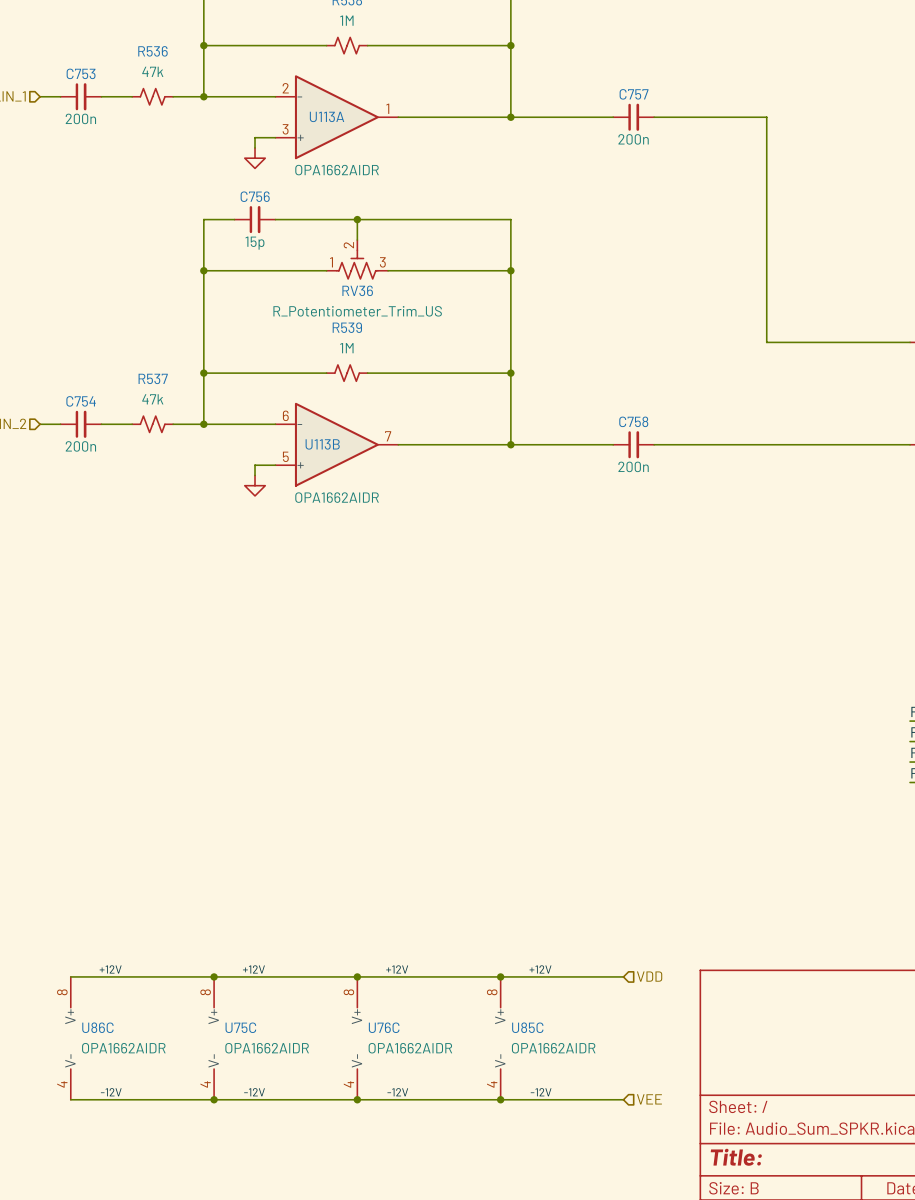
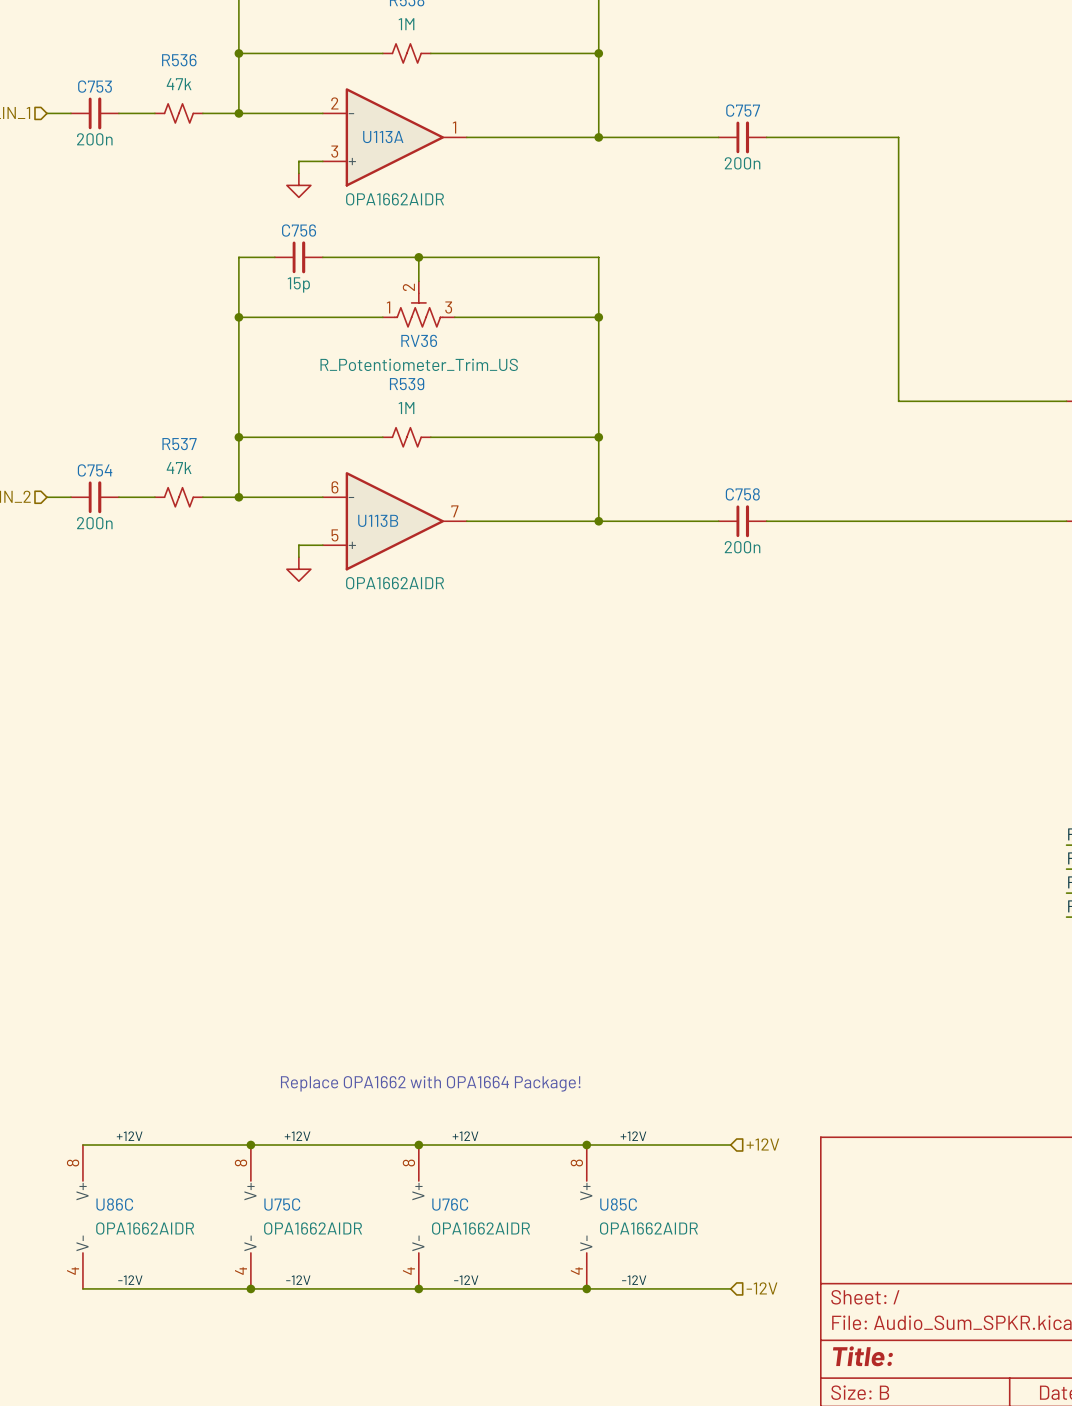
text: none -> Replace OPA1662 with OPA1664 Package! (430, 1083)
hierarchical label: VDD (649, 976) -> +12V (762, 1144)
hierarchical label: VEE (649, 1099) -> -12V (762, 1288)

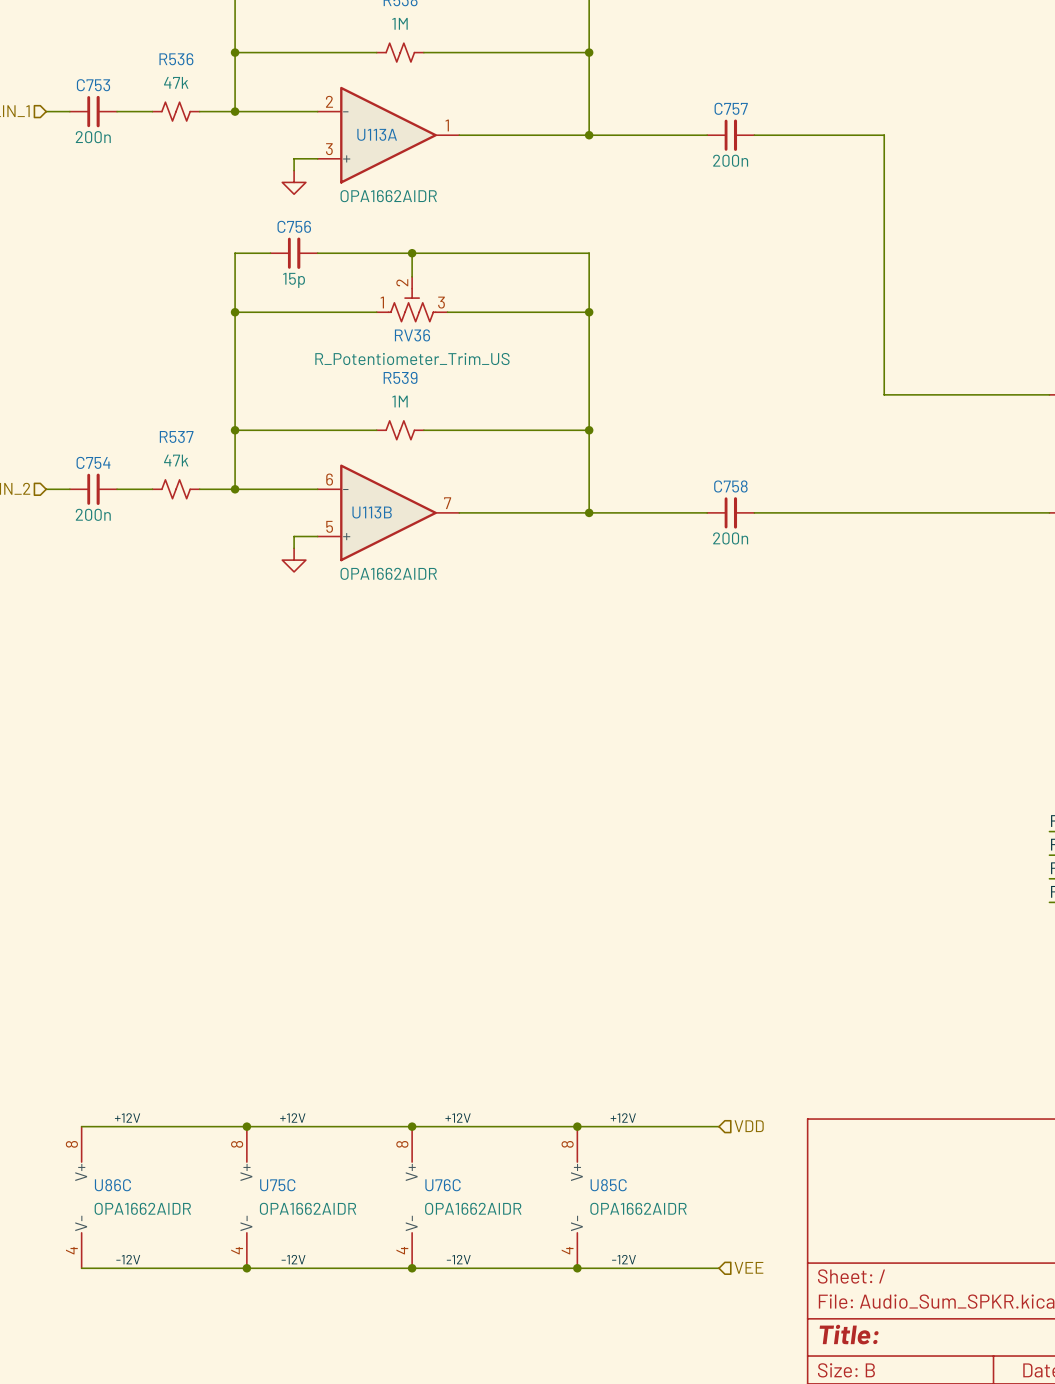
text: Replace OPA1662 with OPA1664 Package! (430, 1083) -> none
hierarchical label: +12V (762, 1144) -> VDD (749, 1126)
hierarchical label: -12V (762, 1288) -> VEE (748, 1267)

